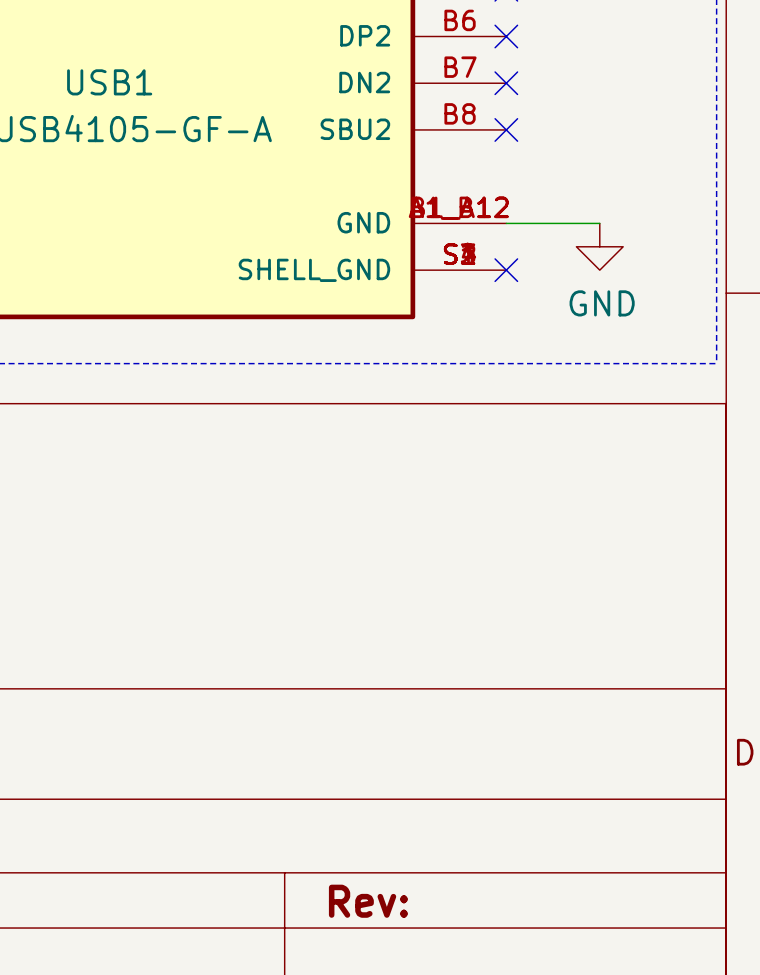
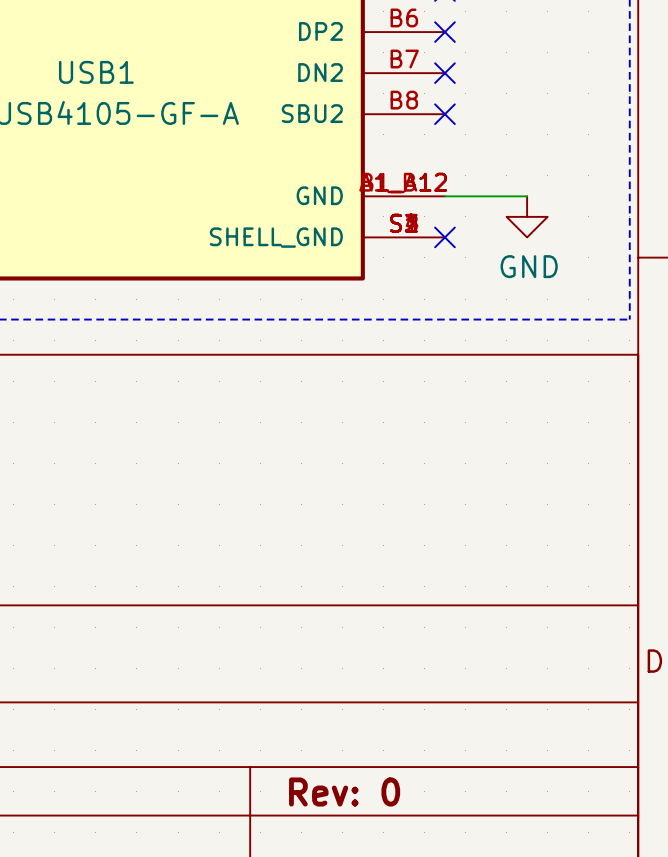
title block: Rev: (368, 901) -> Rev: 0 (344, 792)

